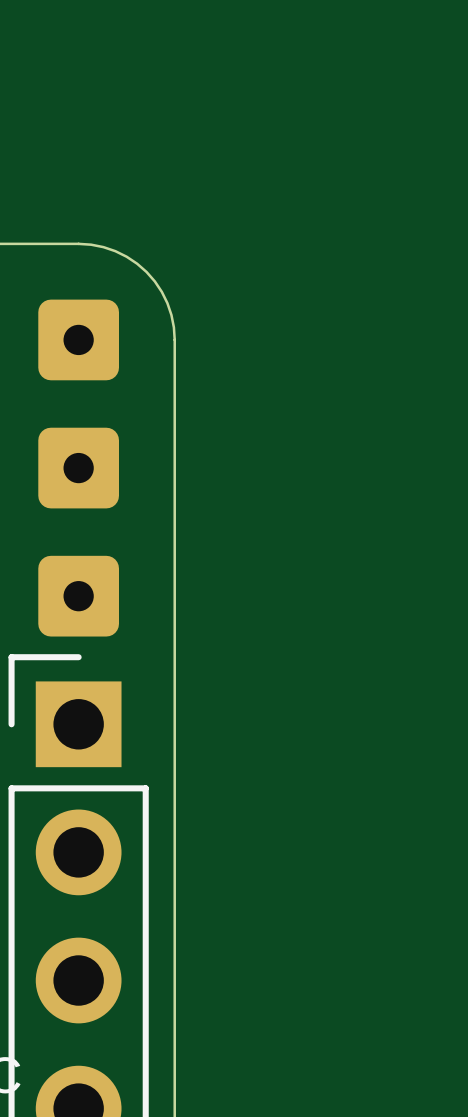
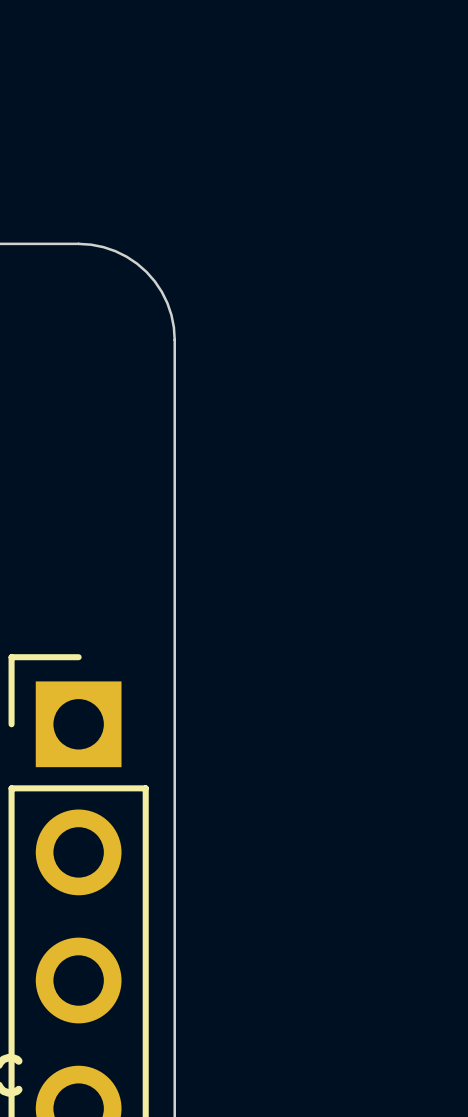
part: (78, 339) -> none
part: (78, 468) -> none
part: (78, 596) -> none

